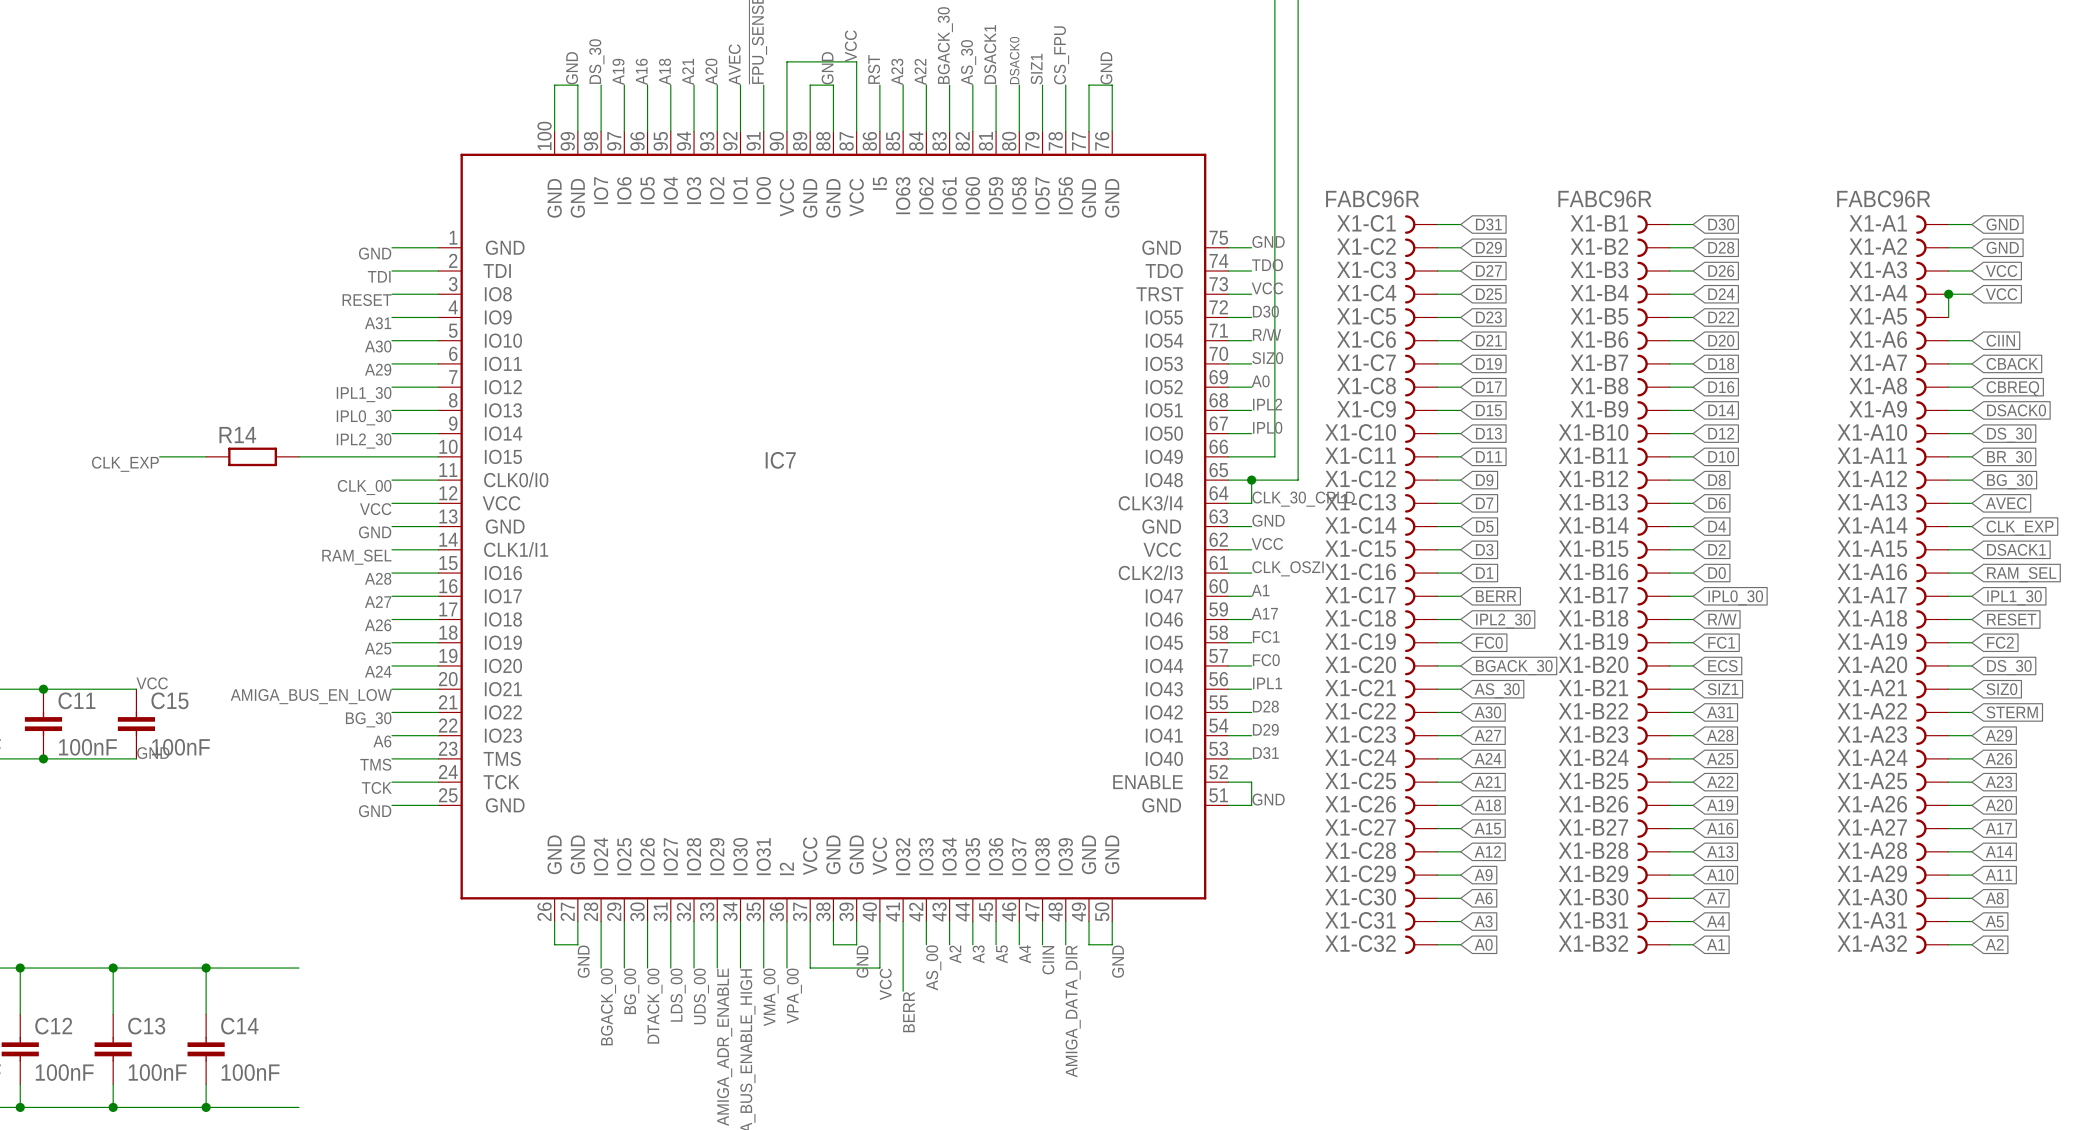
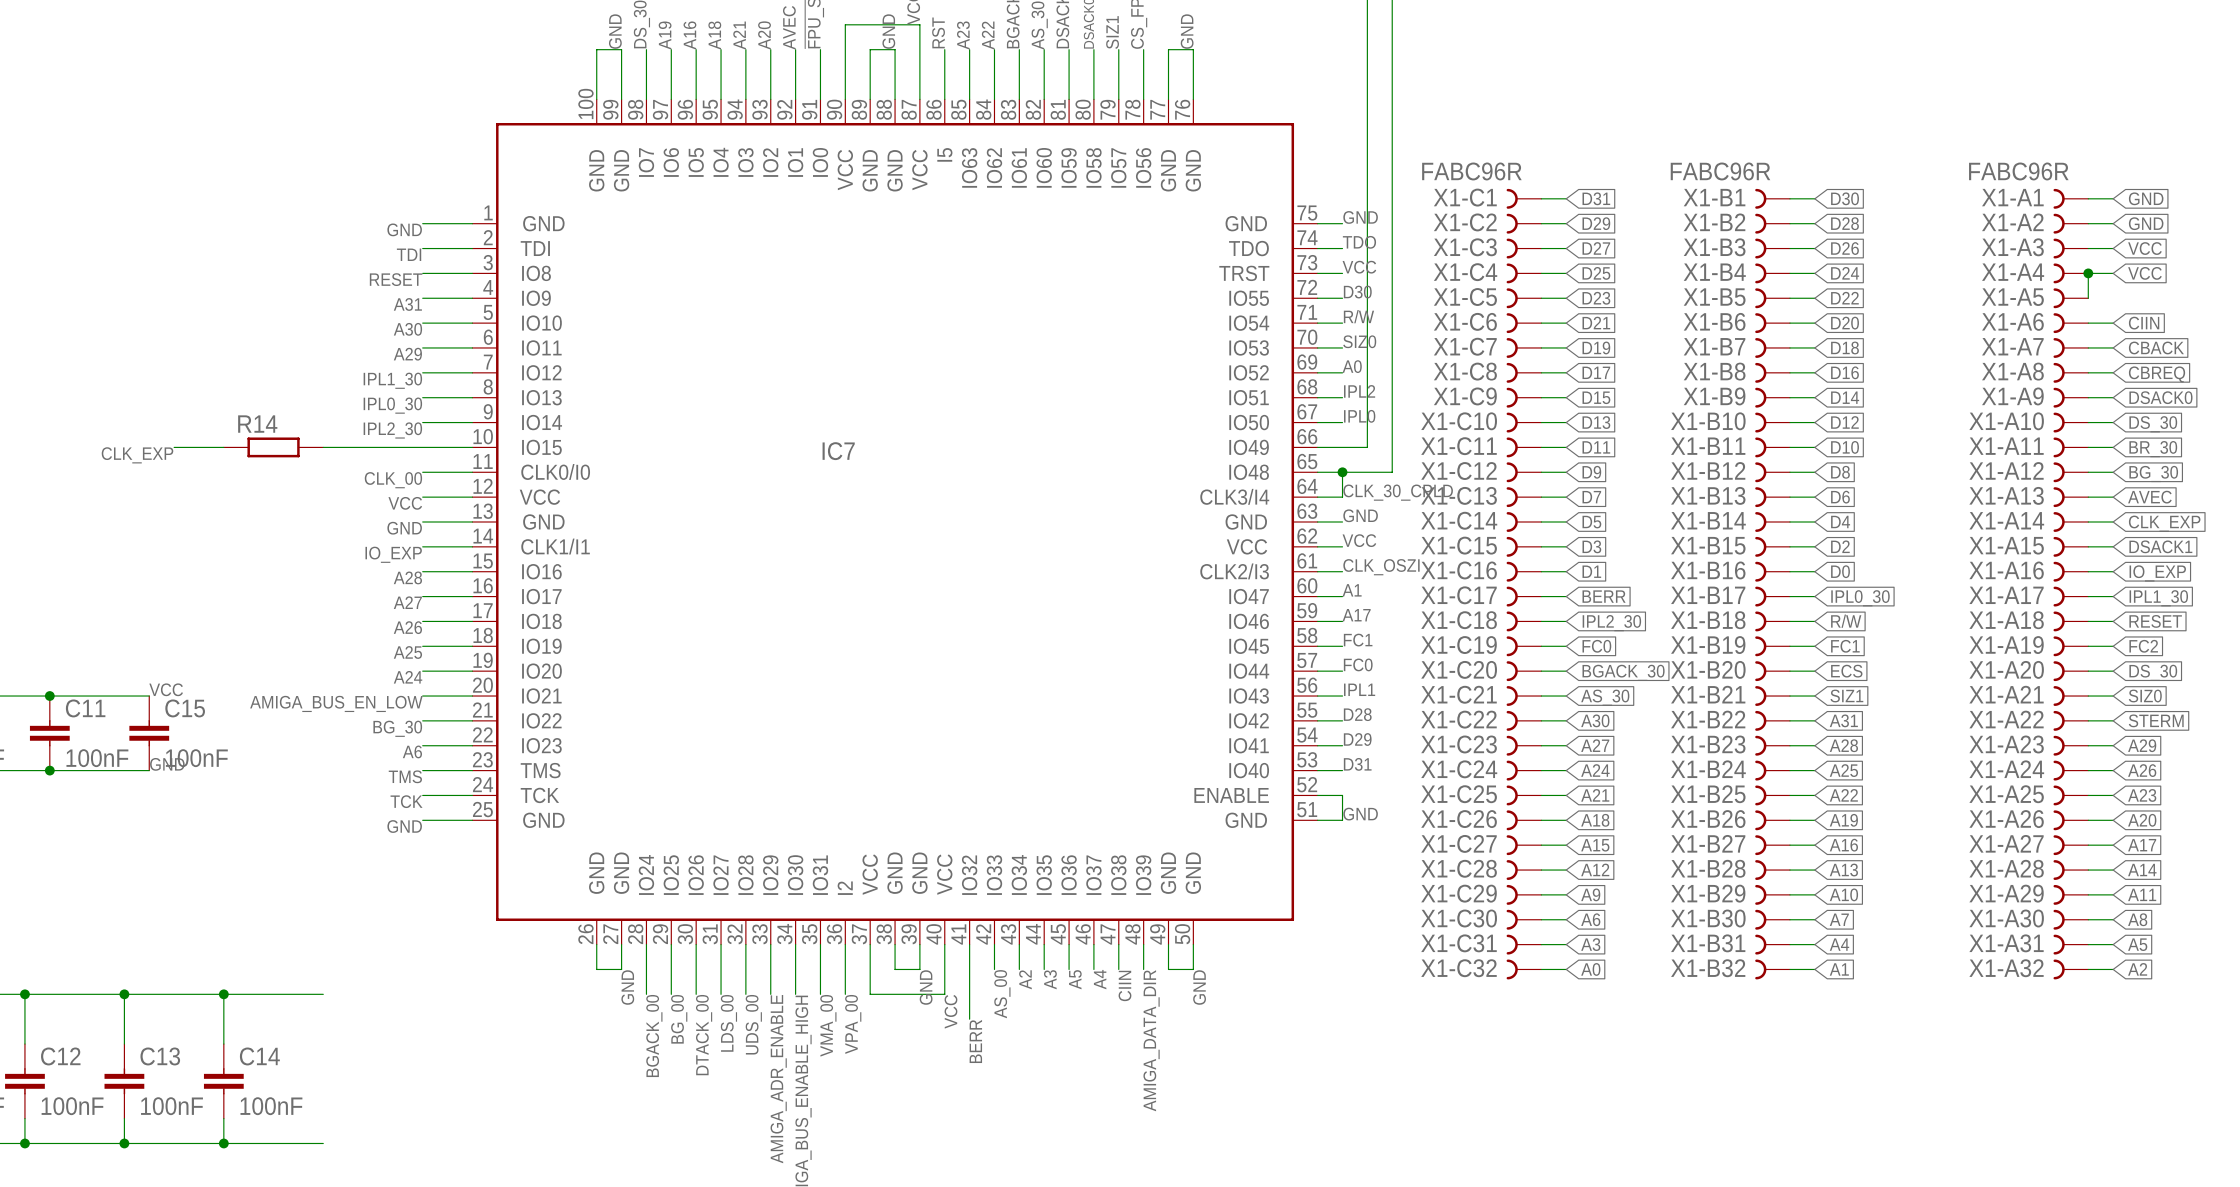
label: RAM_SEL (356, 557) -> IO_EXP (393, 554)
global label: RAM_SEL (2021, 574) -> IO_EXP (2157, 573)

